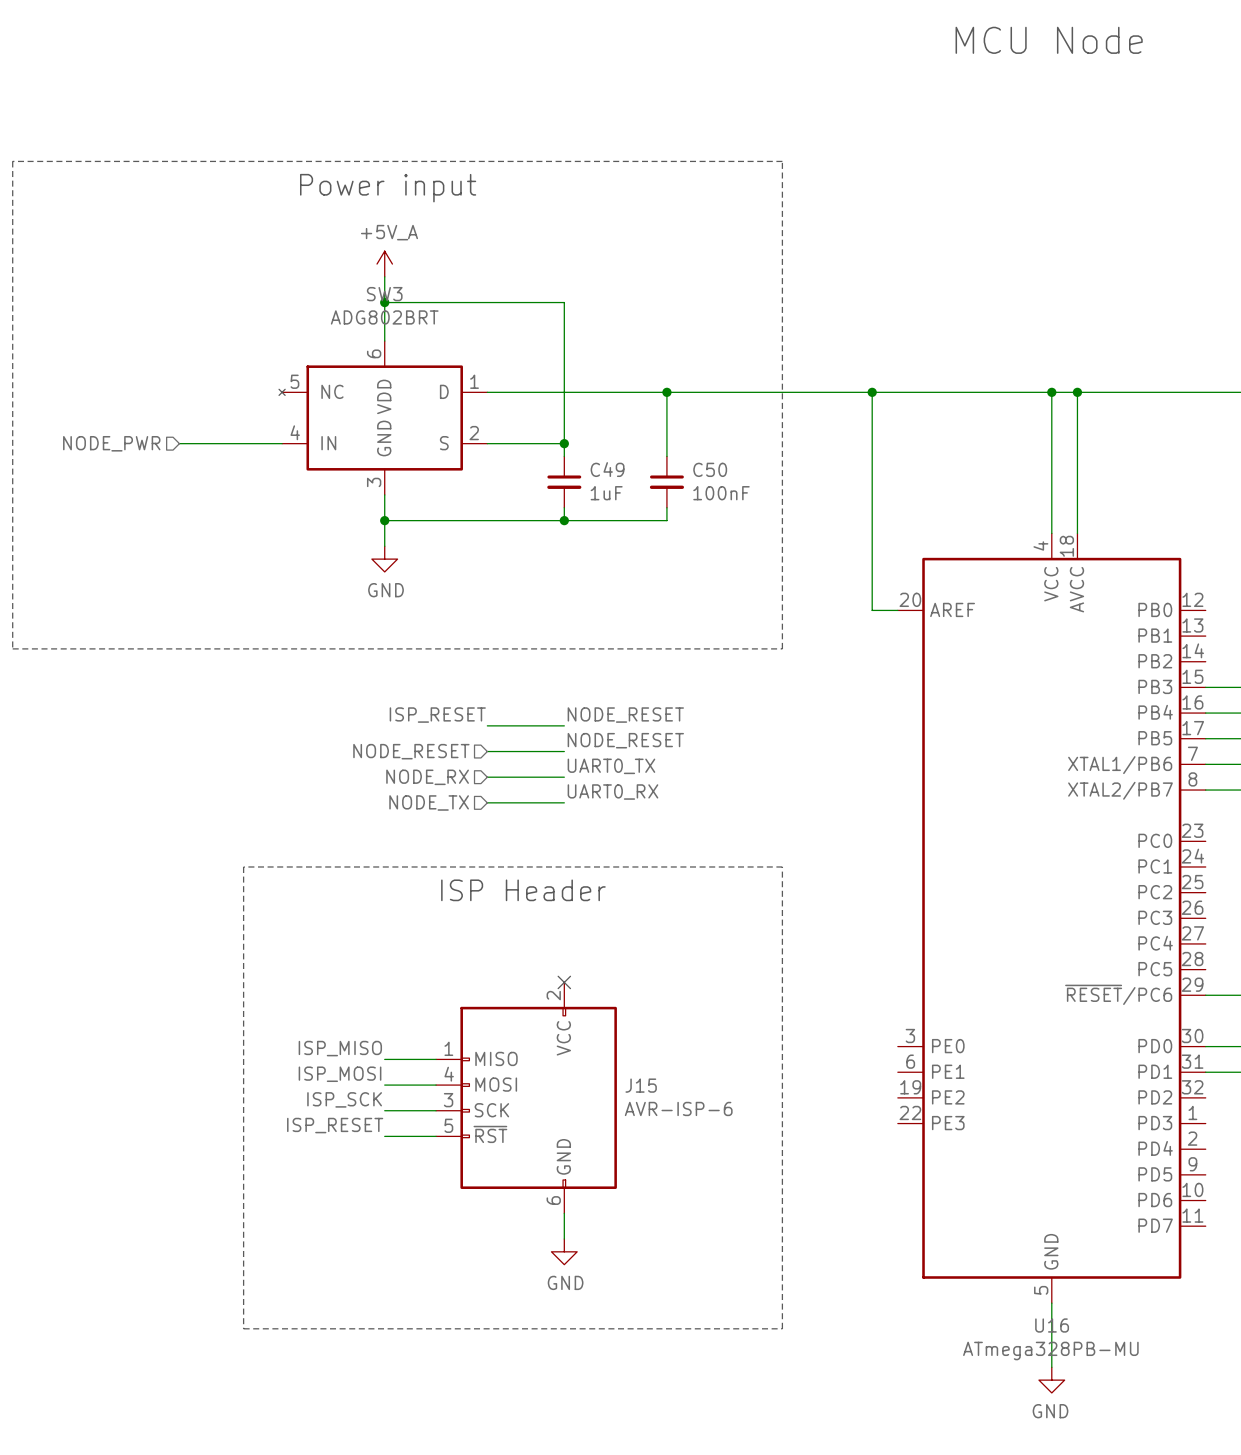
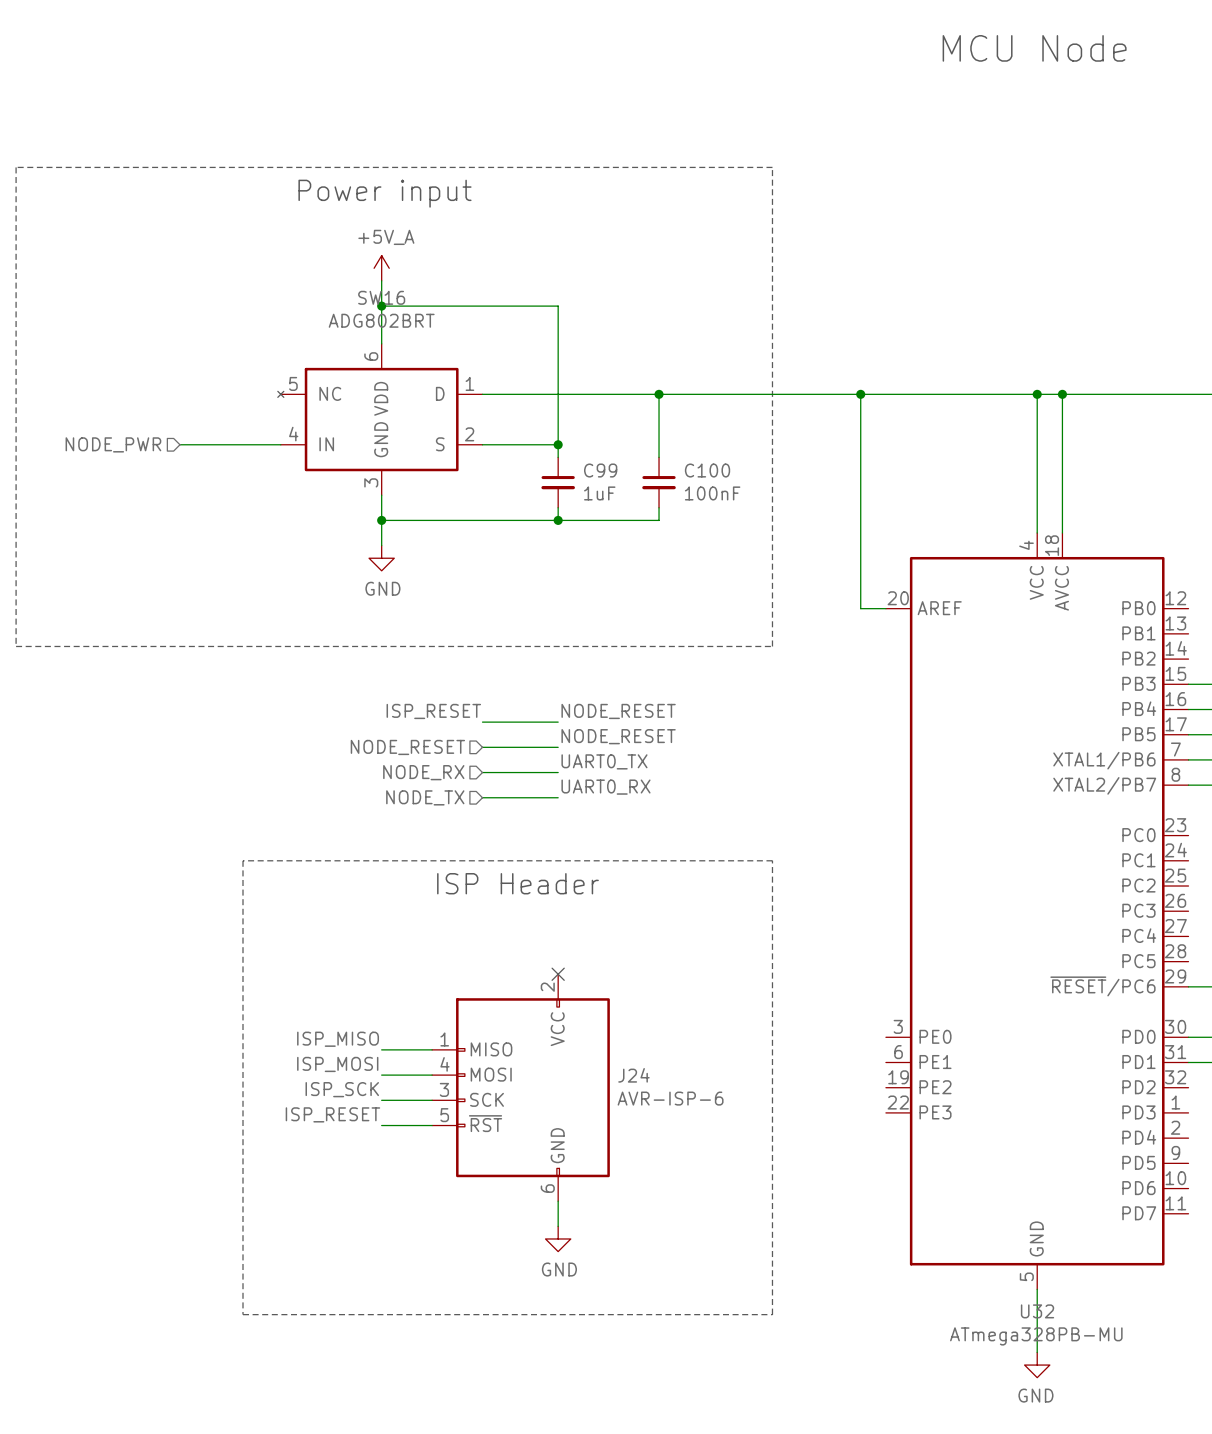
SW3 name: SW3 (384, 294) -> SW16 (381, 297)
C49 name: C49 (607, 469) -> C99 (600, 470)
C50 name: C50 (710, 469) -> C100 (707, 470)
J15 name: J15 (641, 1085) -> J24 (633, 1075)
U16 name: U16 (1052, 1325) -> U32 (1037, 1311)

